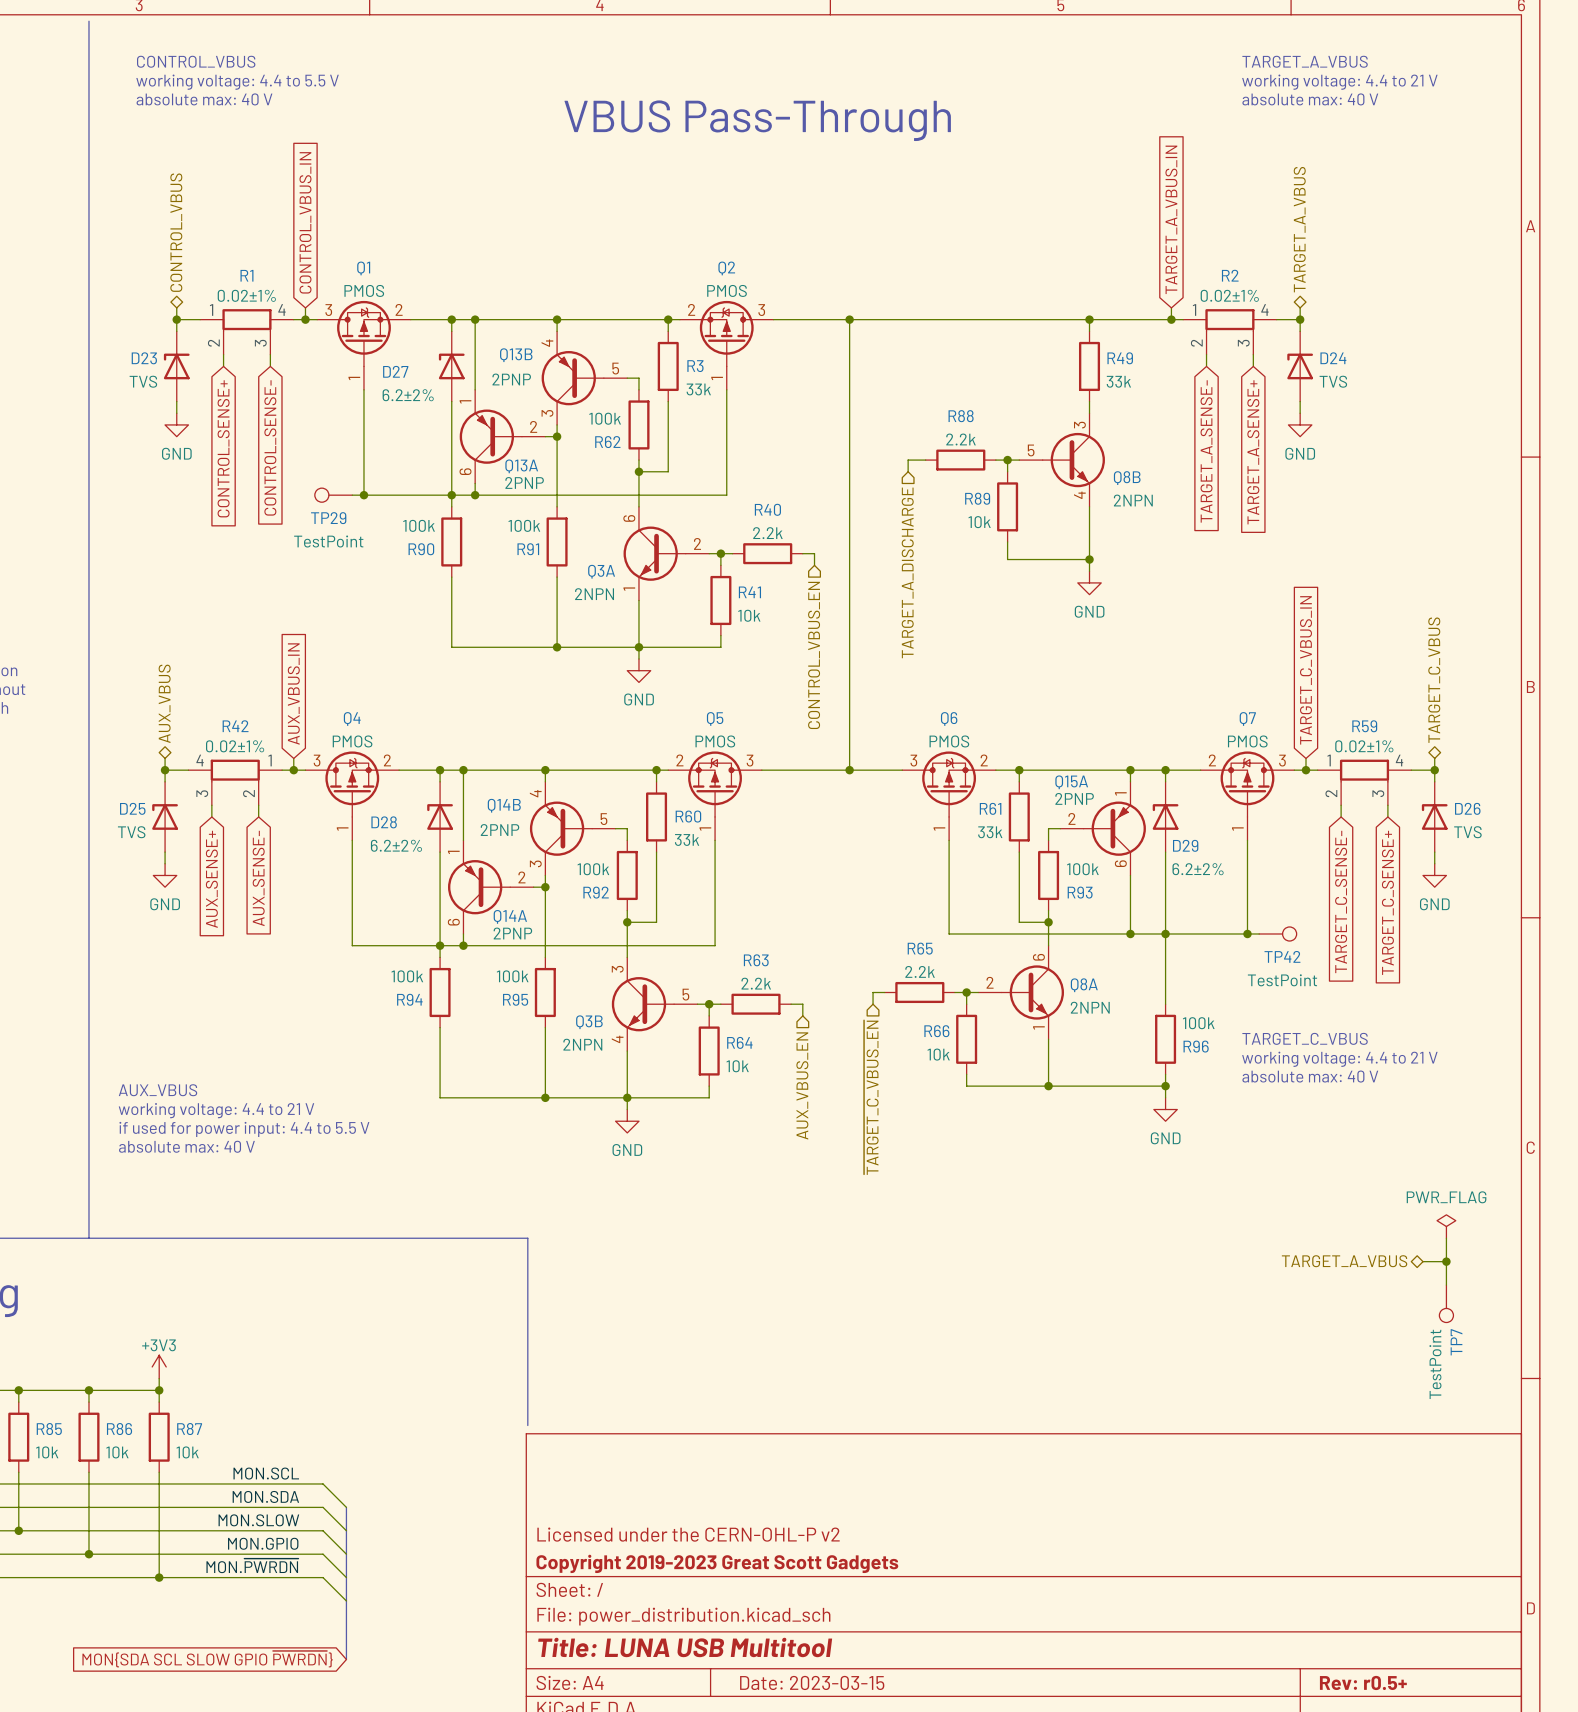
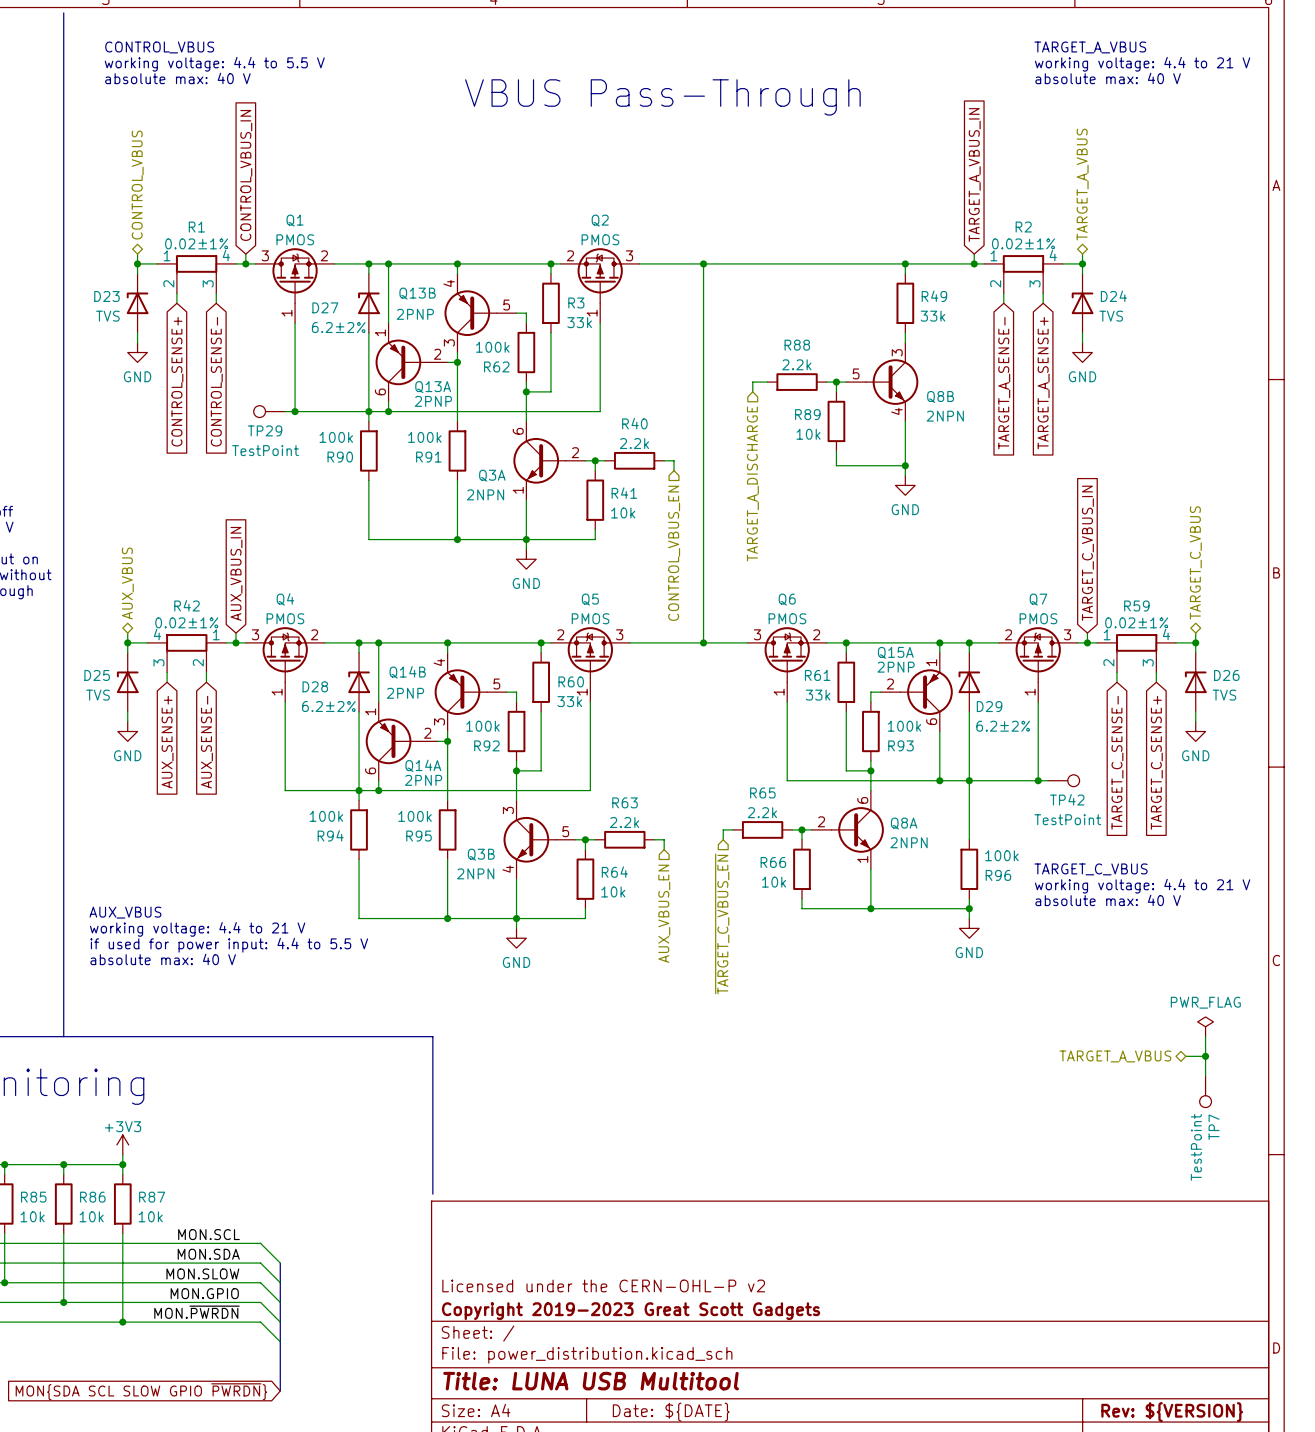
title block: Date: 2023-03-15 (812, 1682) -> Date: ${DATE} (671, 1412)
title block: Rev: r0.5+ (1363, 1682) -> Rev: ${VERSION} (1172, 1412)

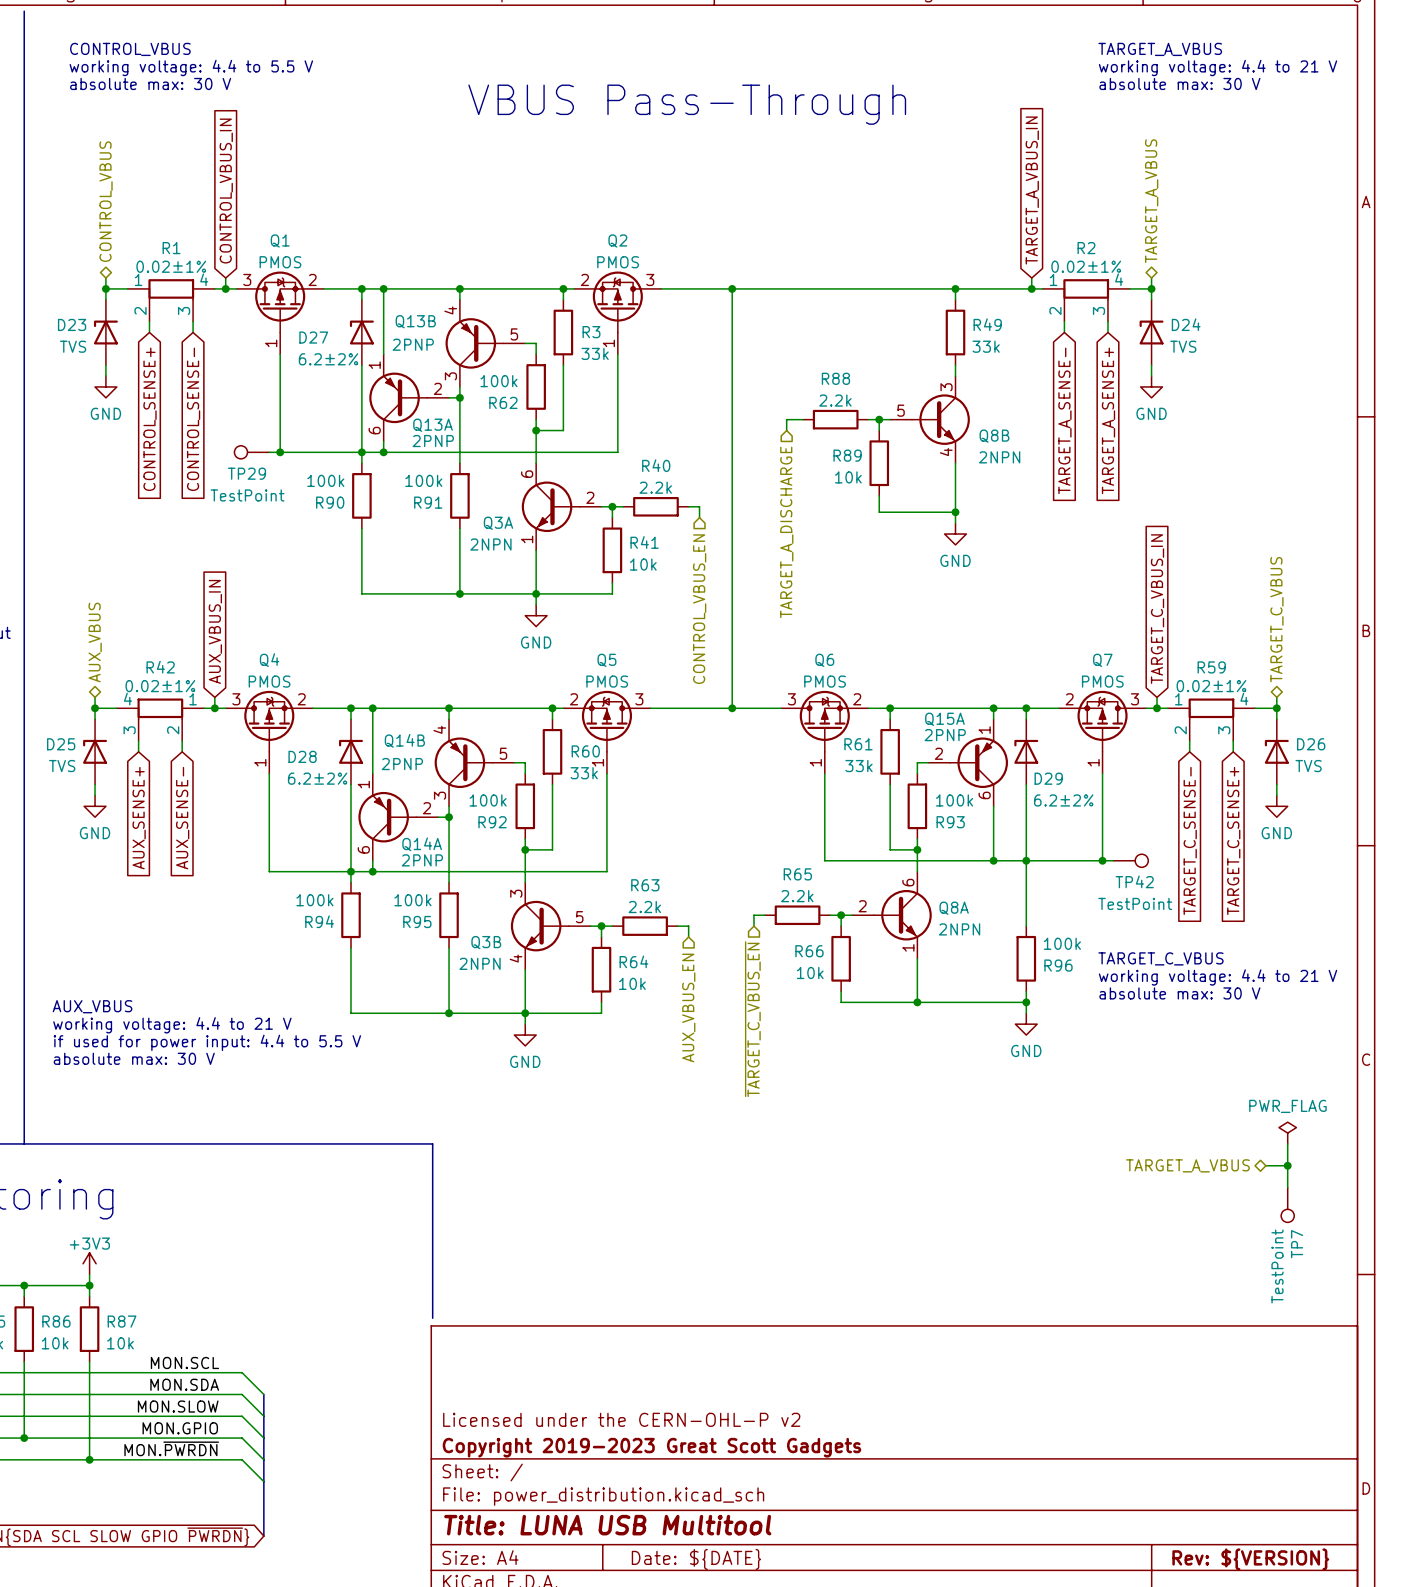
text: absolute max: 40 V (177, 78) -> absolute max: 30 V (150, 83)
text: absolute max: 40 V (1108, 78) -> absolute max: 30 V (1179, 83)
text: absolute max: 40 V (1108, 900) -> absolute max: 30 V (1179, 993)
text: absolute max: 40 V (163, 959) -> absolute max: 30 V (134, 1058)

